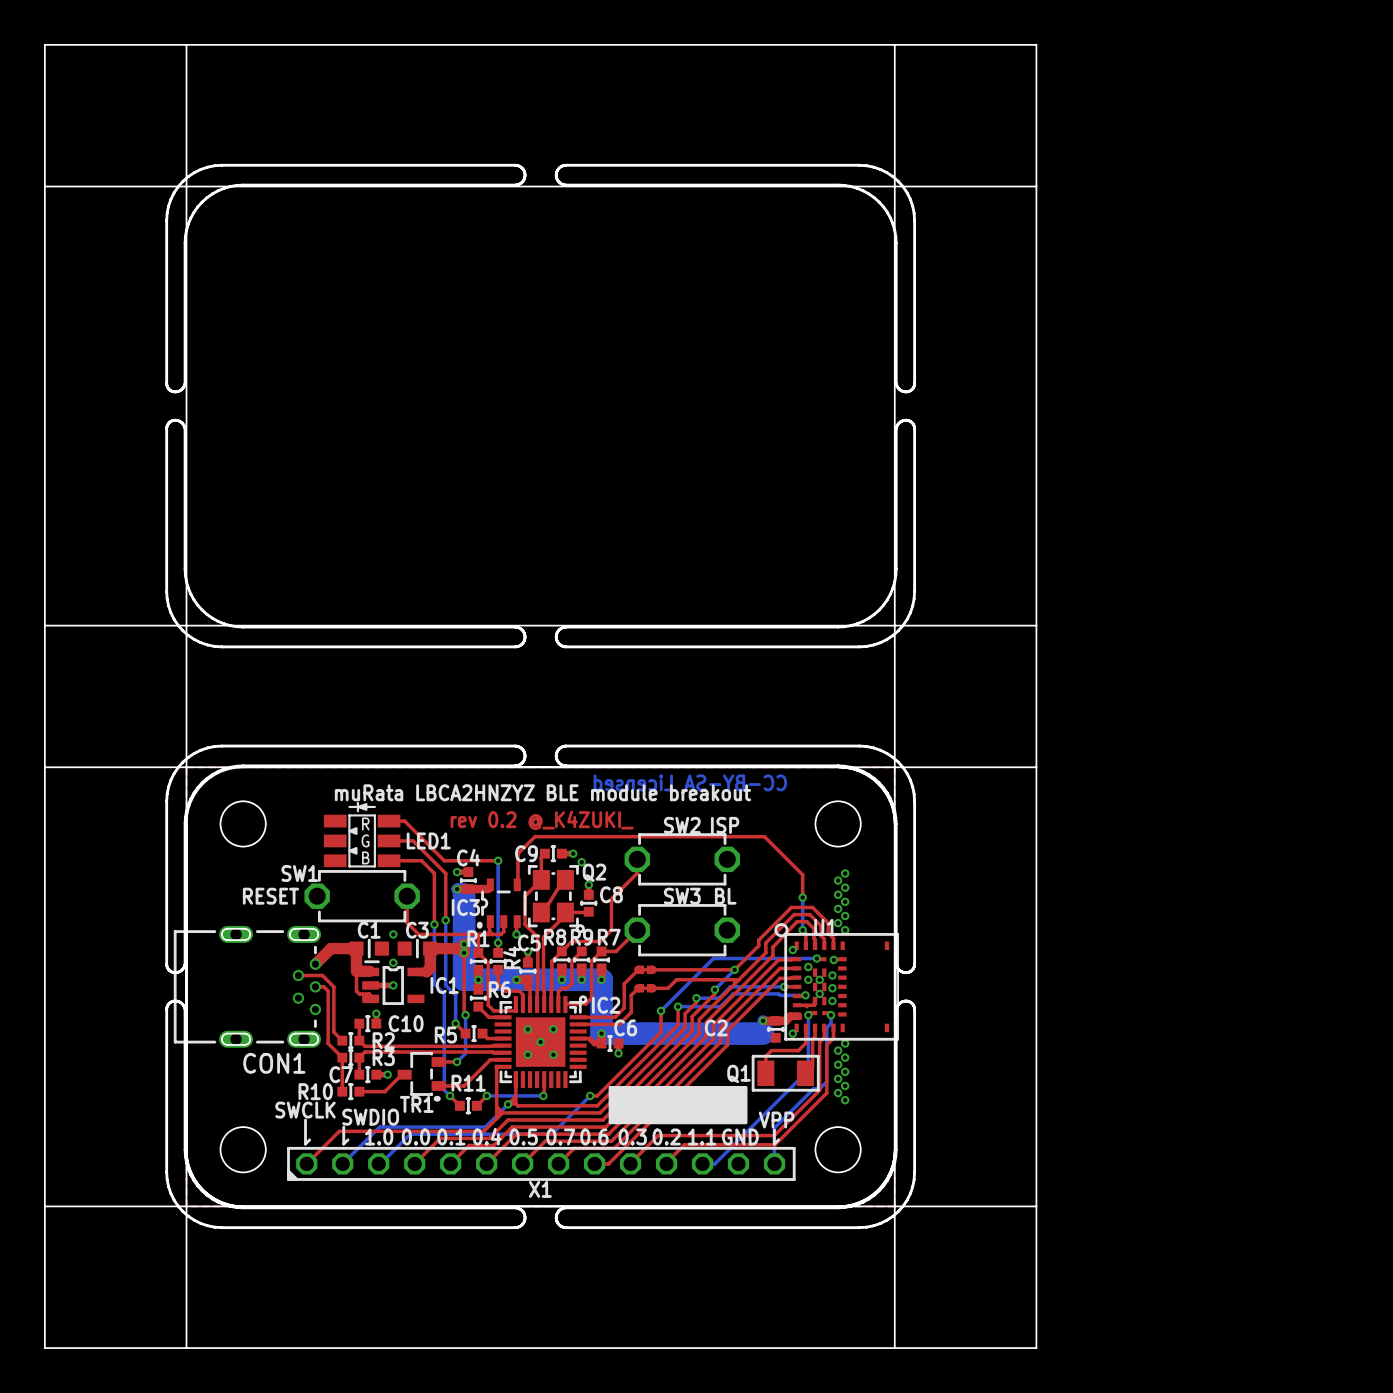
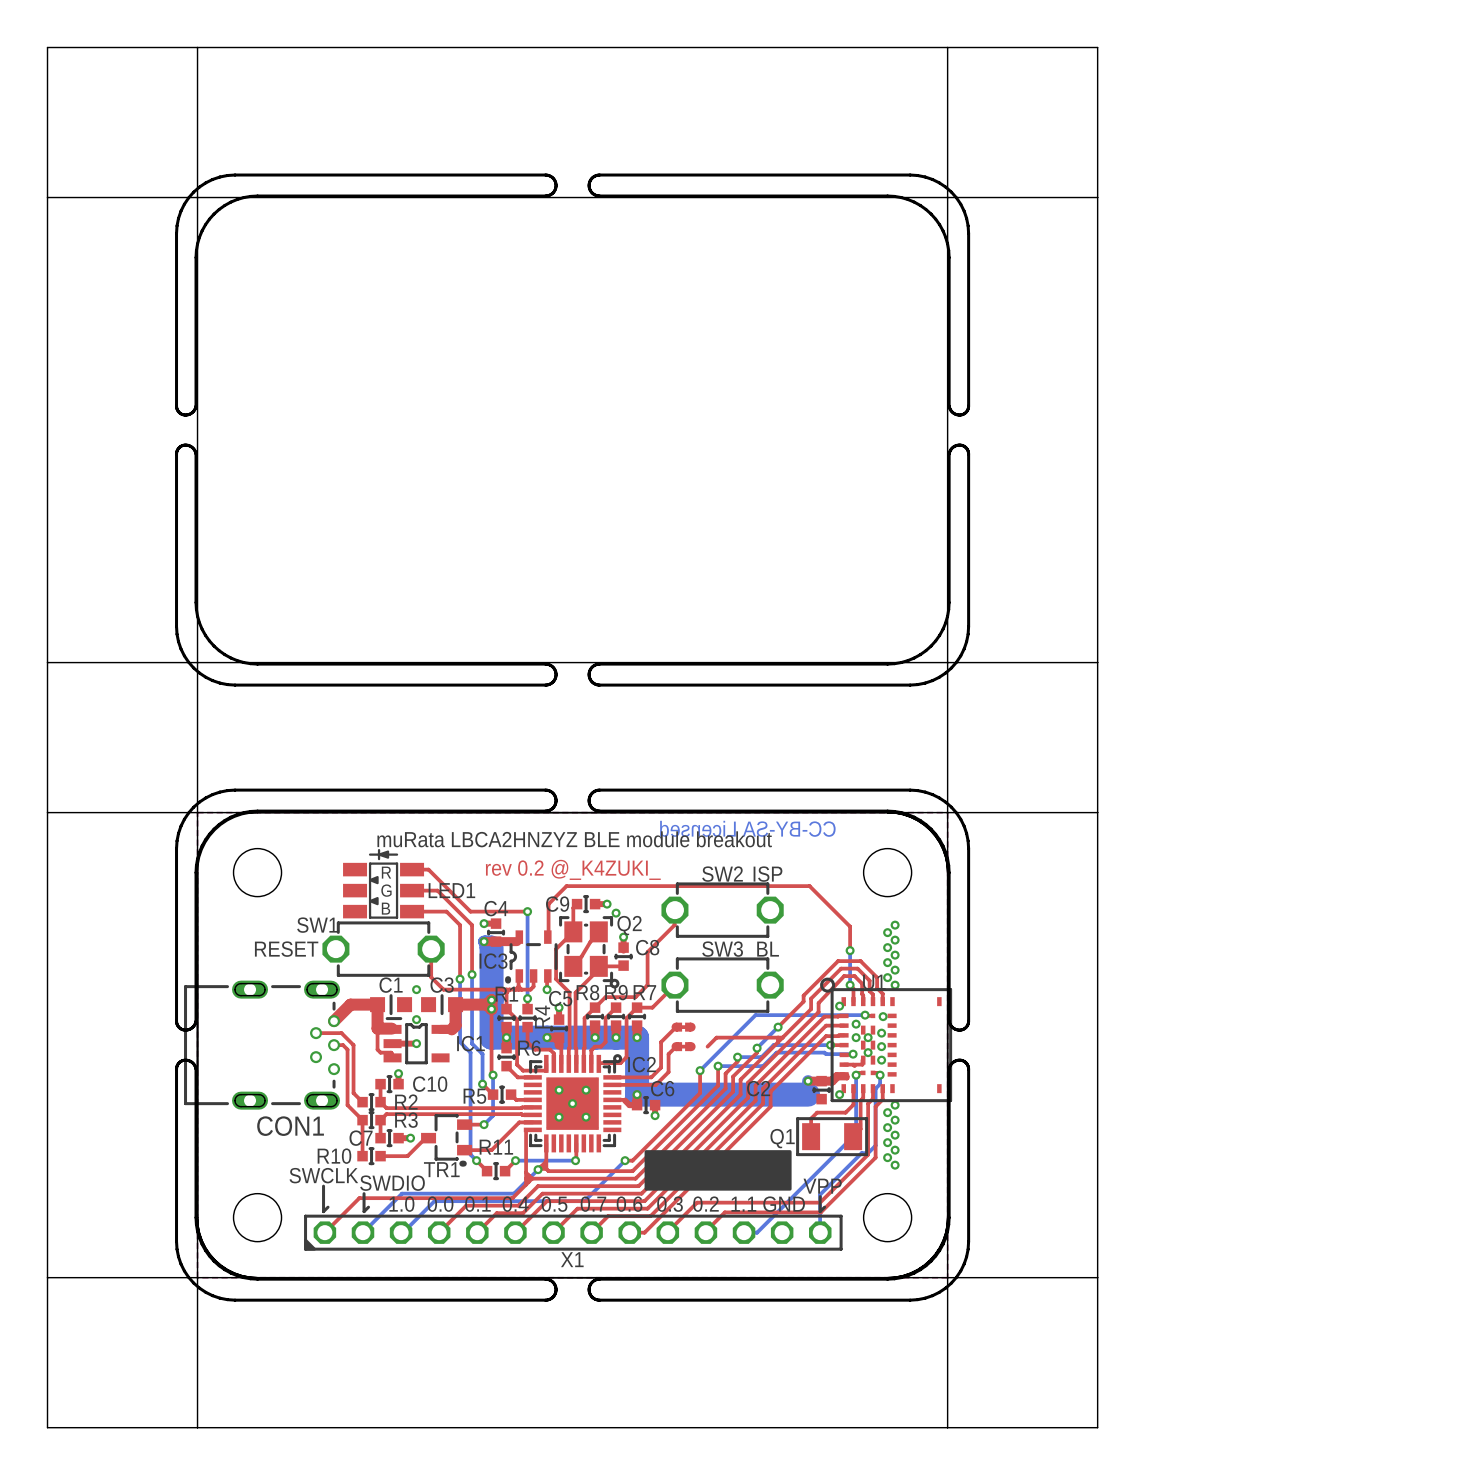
top track: (652, 969) (734, 969) -> none
top track: (652, 988) (668, 988) -> none

